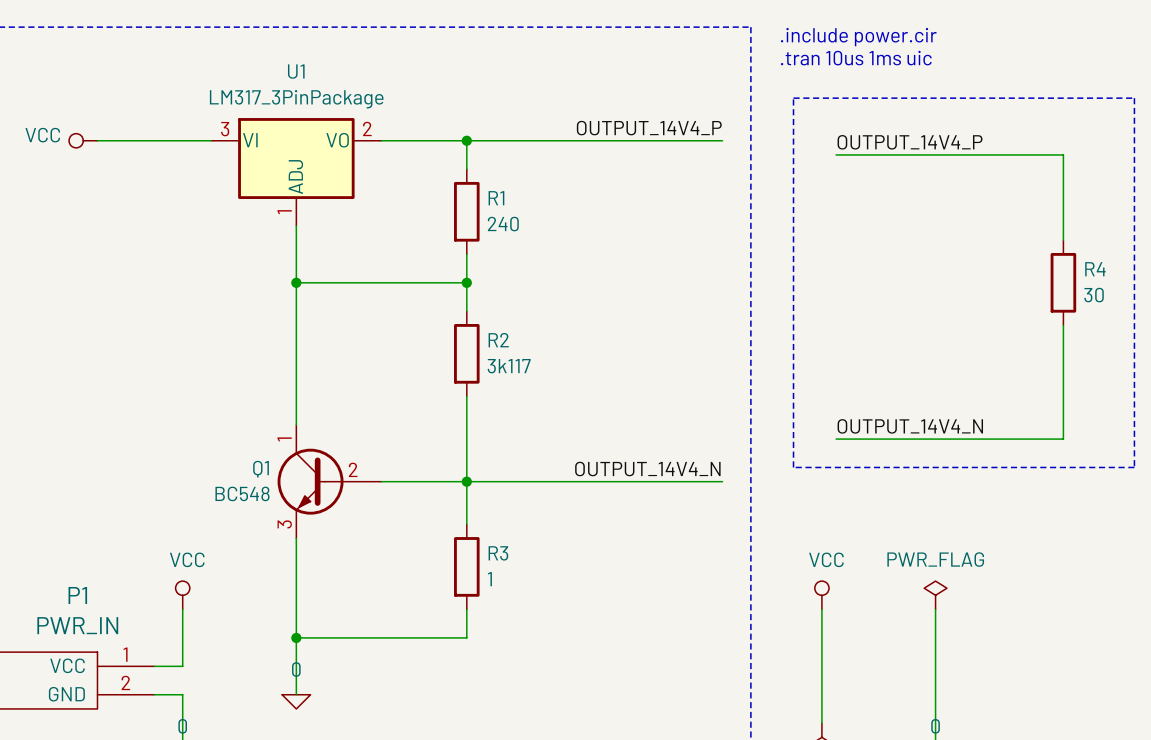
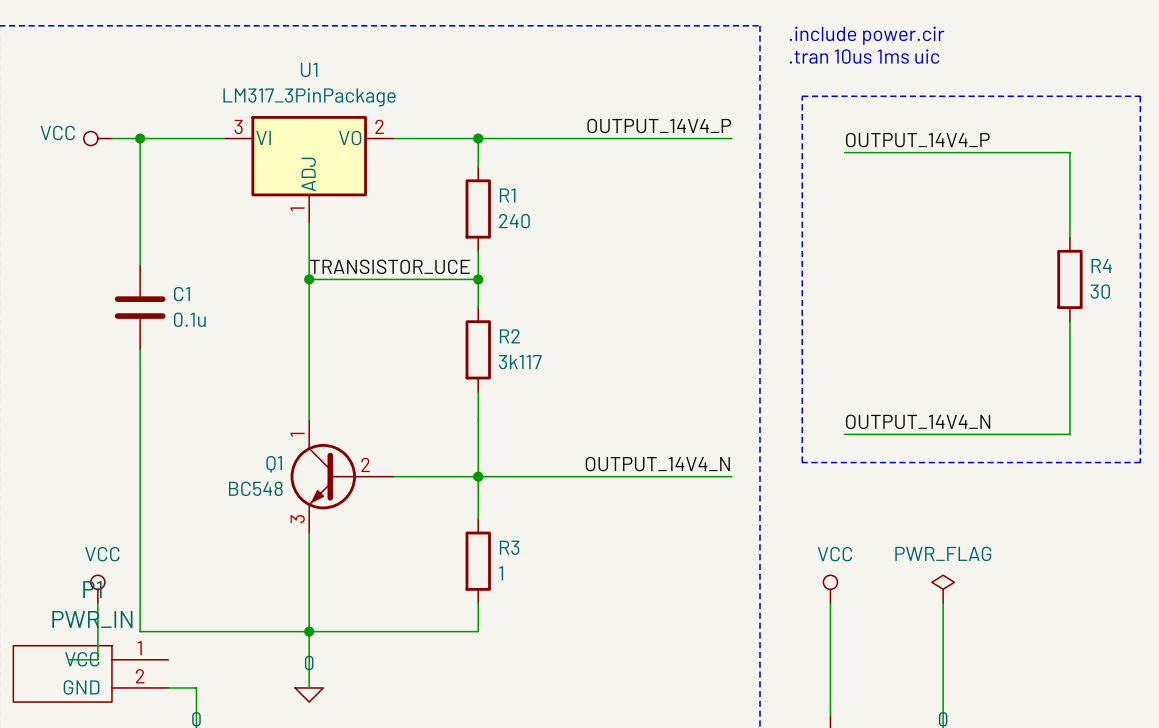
wire: none -> (140, 138) (140, 265)
junction: none -> (140, 138)
label: none -> TRANSISTOR_UCE (389, 266)
C1: none -> 0.1u (140, 307)
wire: none -> (140, 349) (140, 631) (309, 631)
power symbol position: VCC (182, 595) -> VCC (97, 589)
wire: (182, 609) (182, 666) (154, 666) -> (97, 603) (97, 659) (69, 659)

